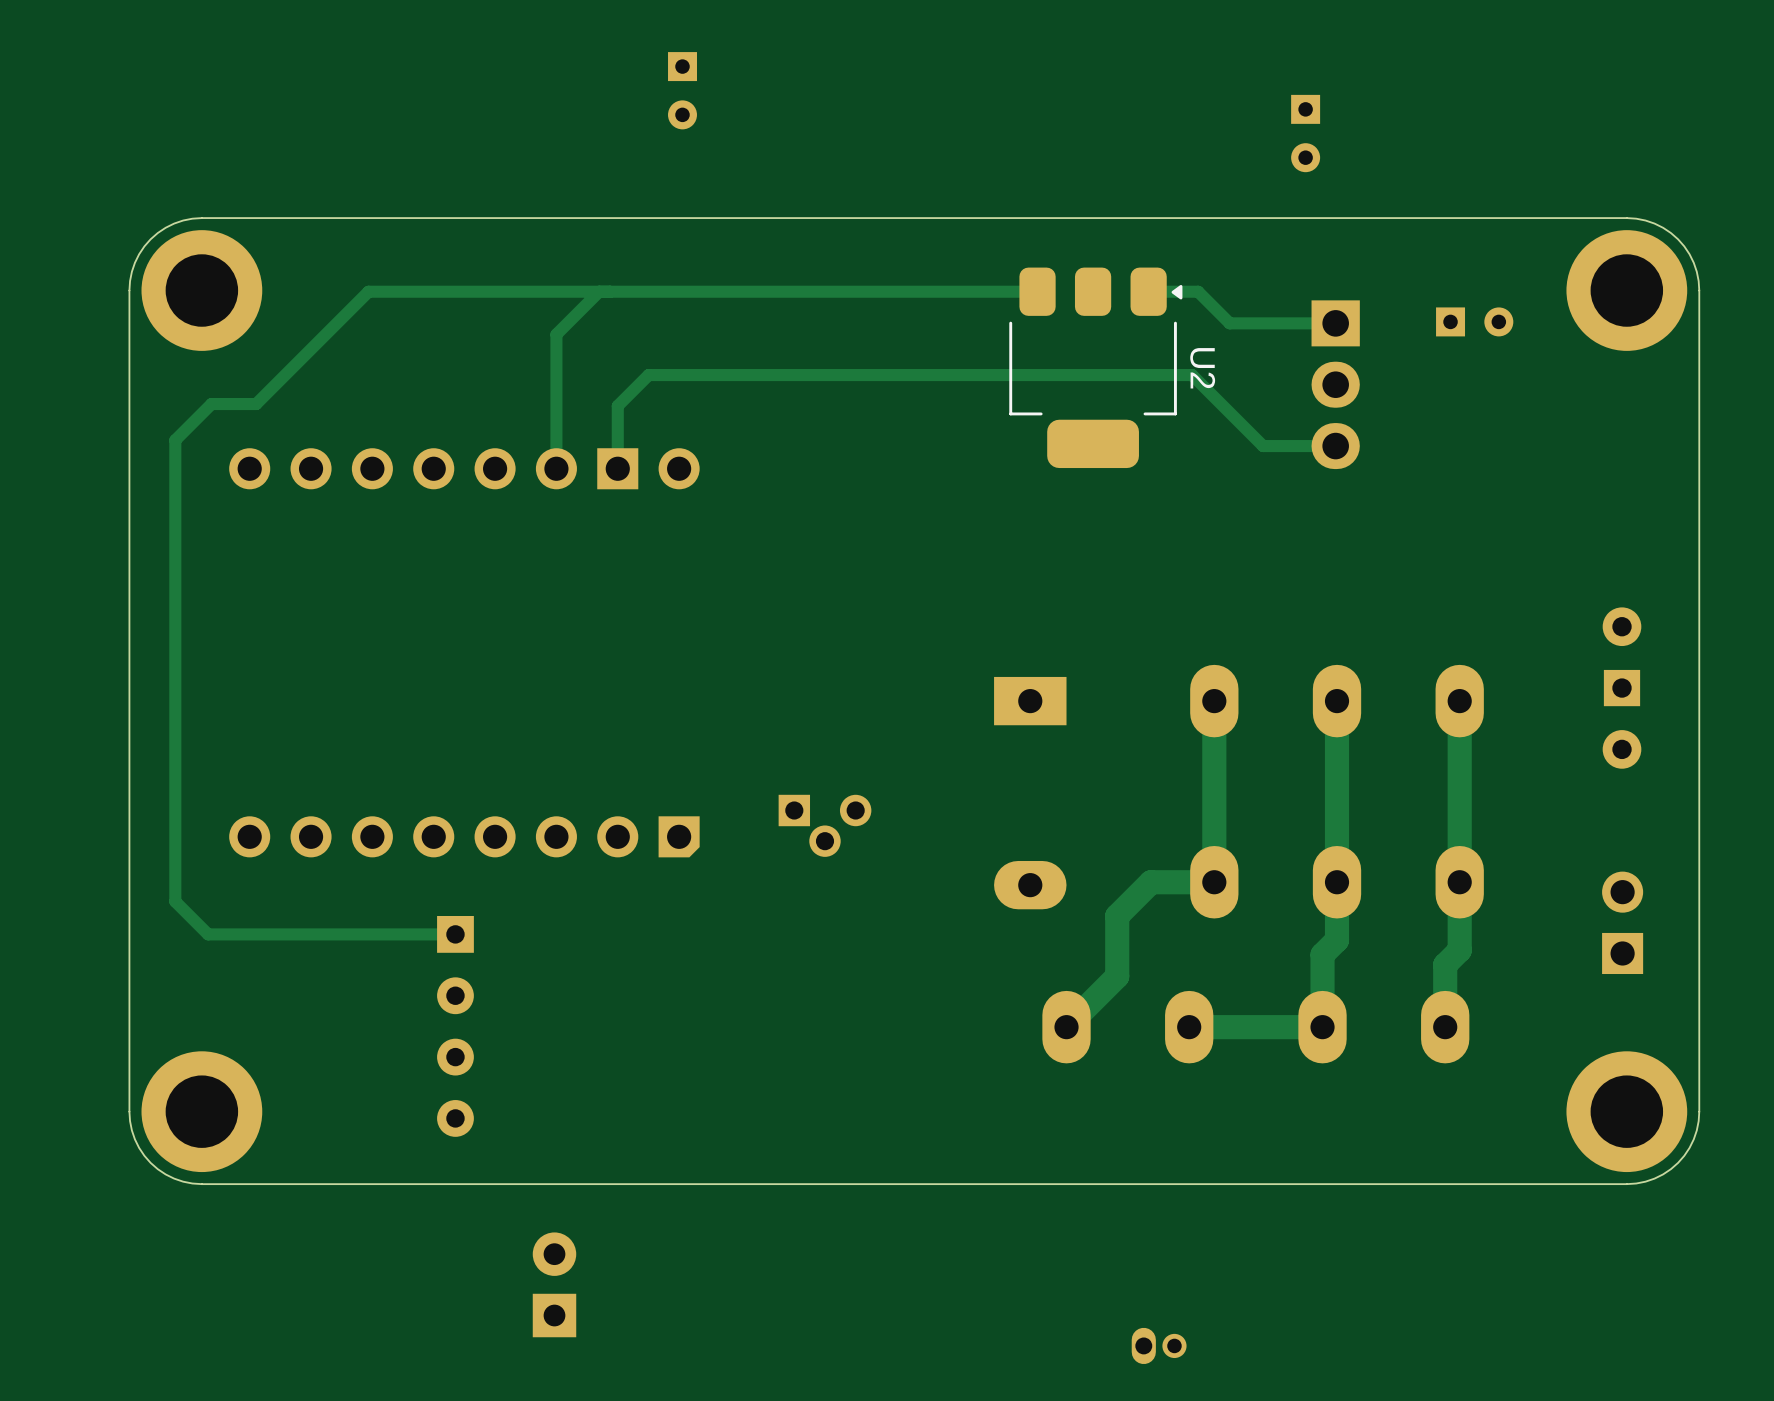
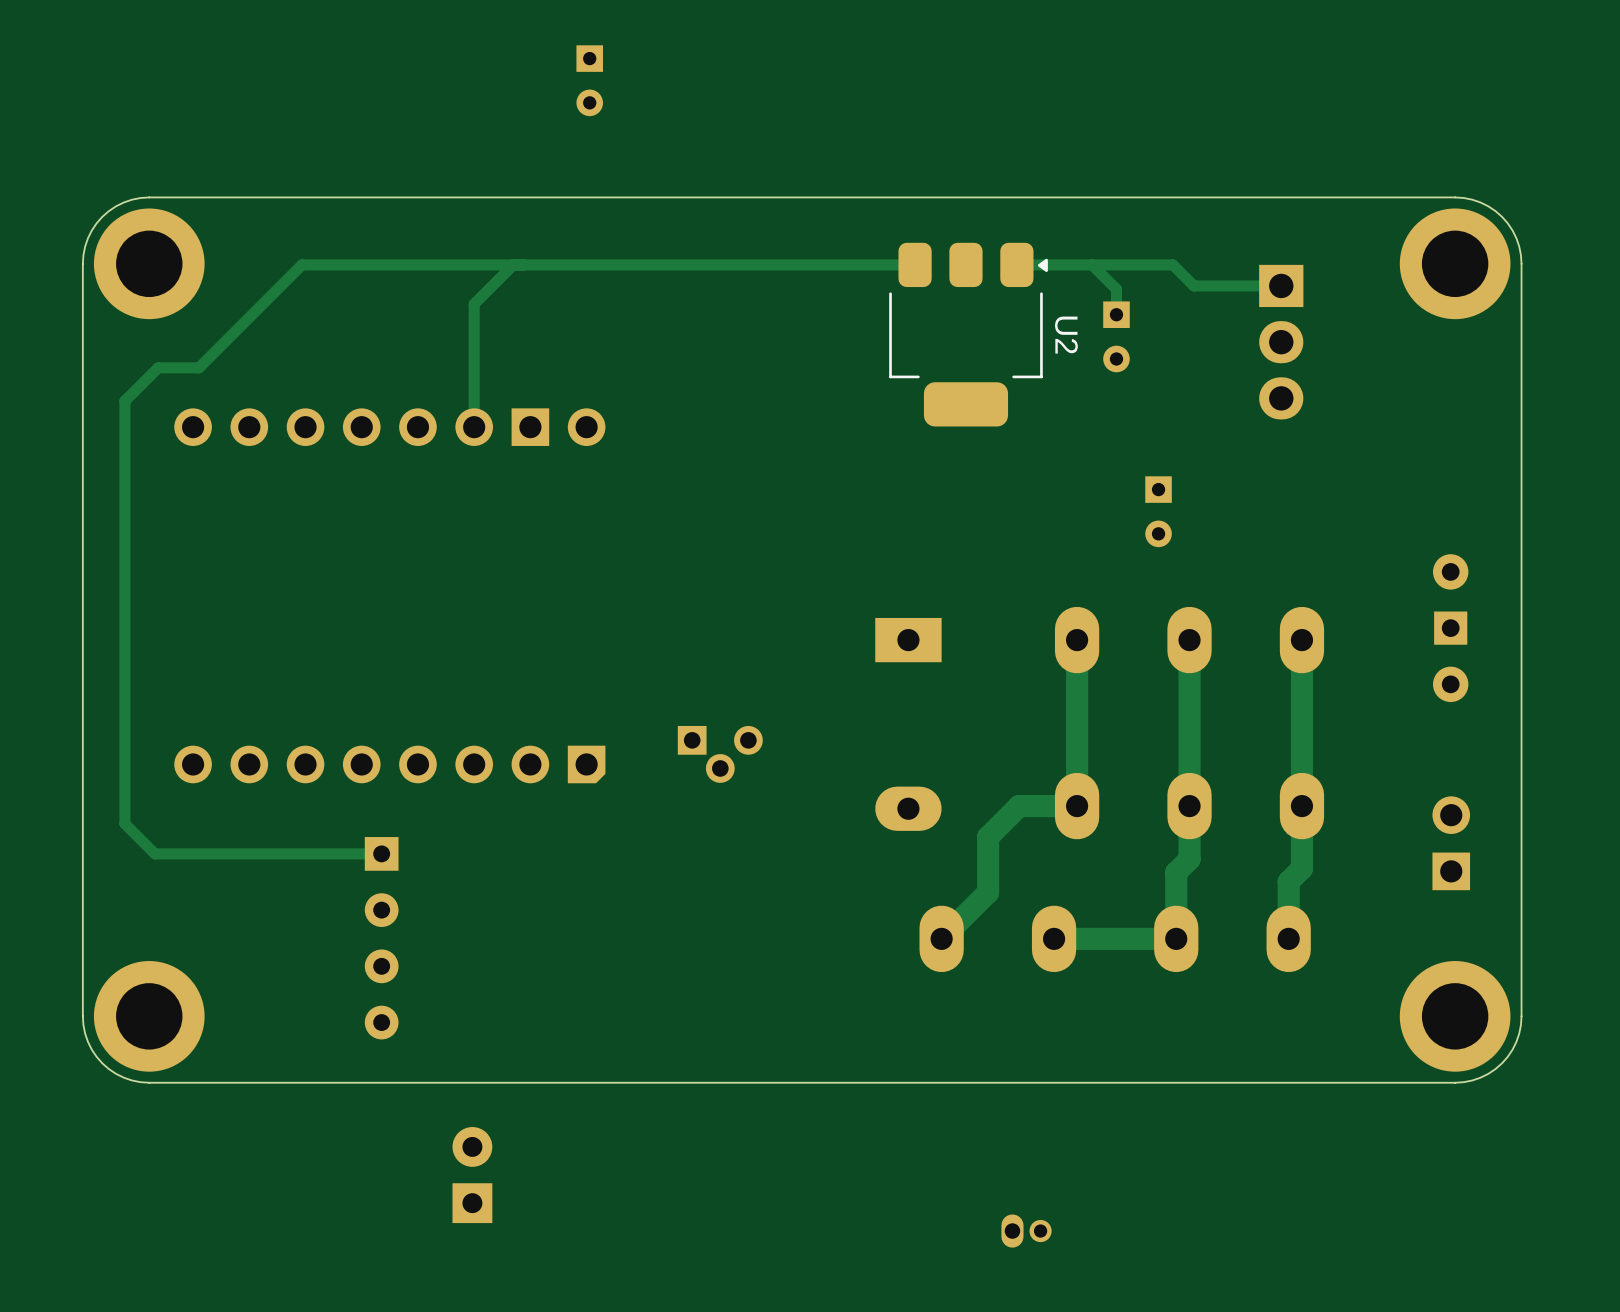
part: (1305, 133) -> none
track: (1198, 291) (1229, 323) (1335, 323) -> (1062, 264) (1172, 264) (1193, 285) (1281, 285)
track: none -> (1092, 264) (1116, 289) (1116, 314)
part: (1474, 321) -> none
part: none -> (1116, 336)
part position: (1335, 384) -> (1281, 342)
track: (1335, 446) (1263, 446) (1192, 375) (648, 375) (617, 405) (617, 468) -> none
part: none -> (1158, 511)

